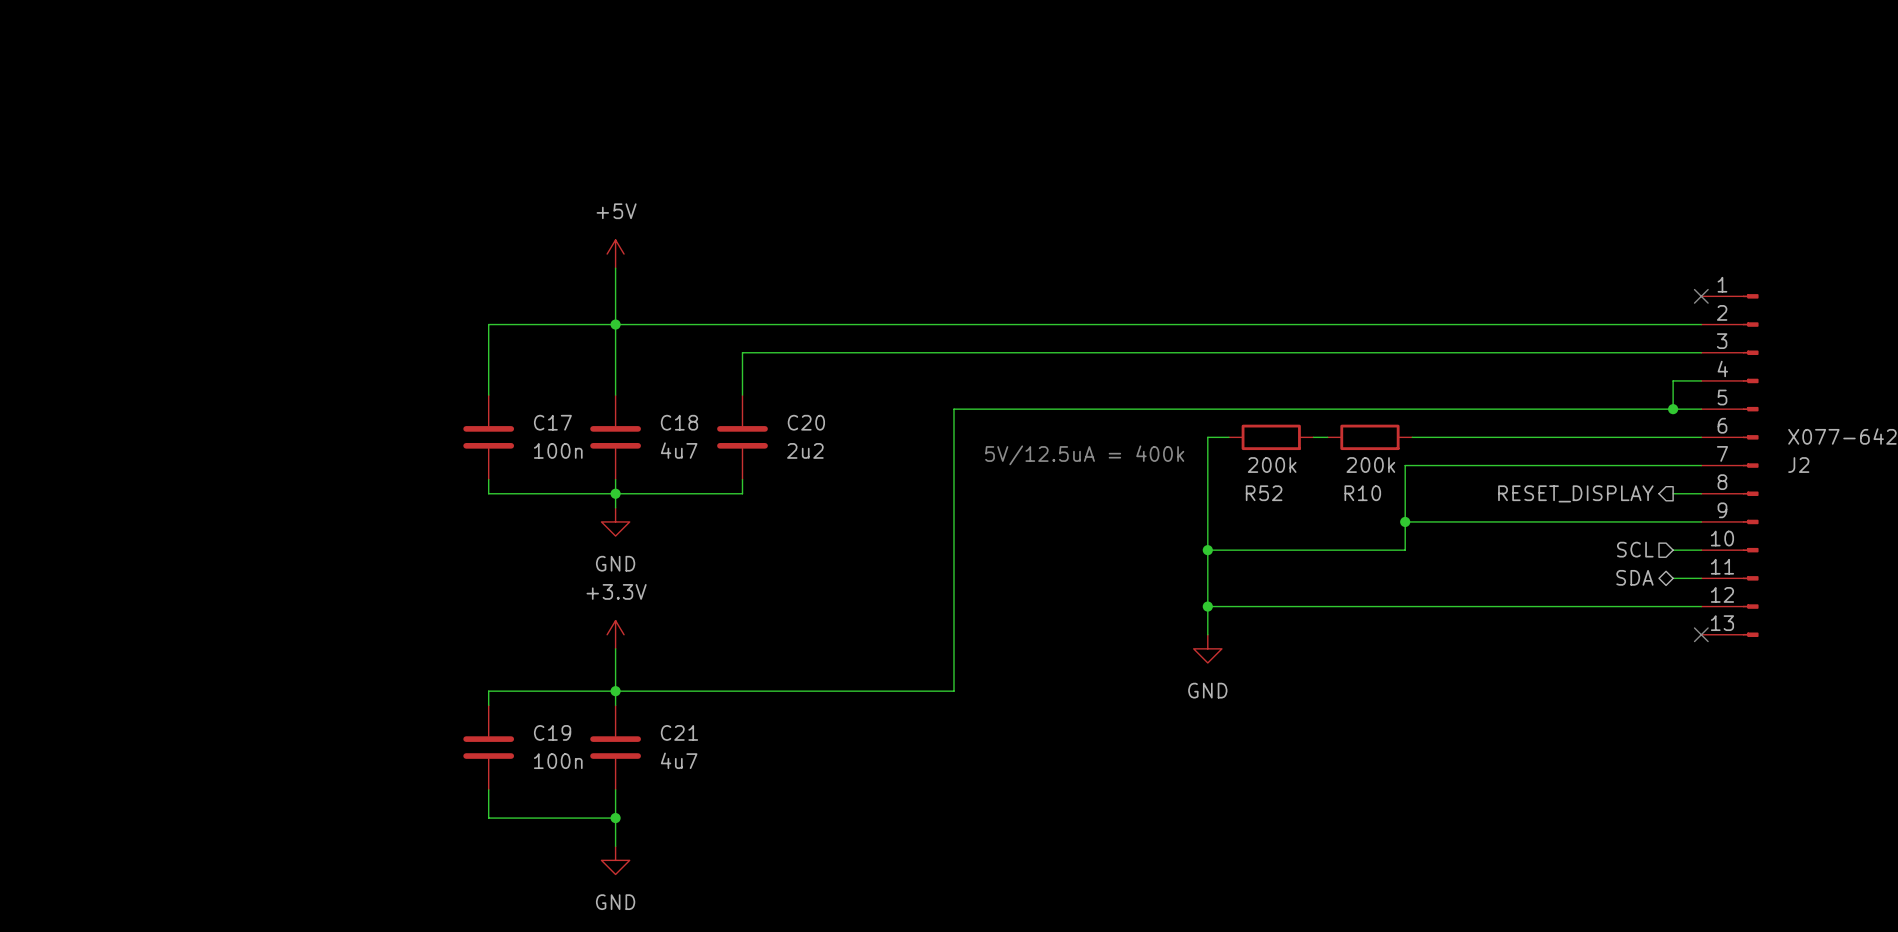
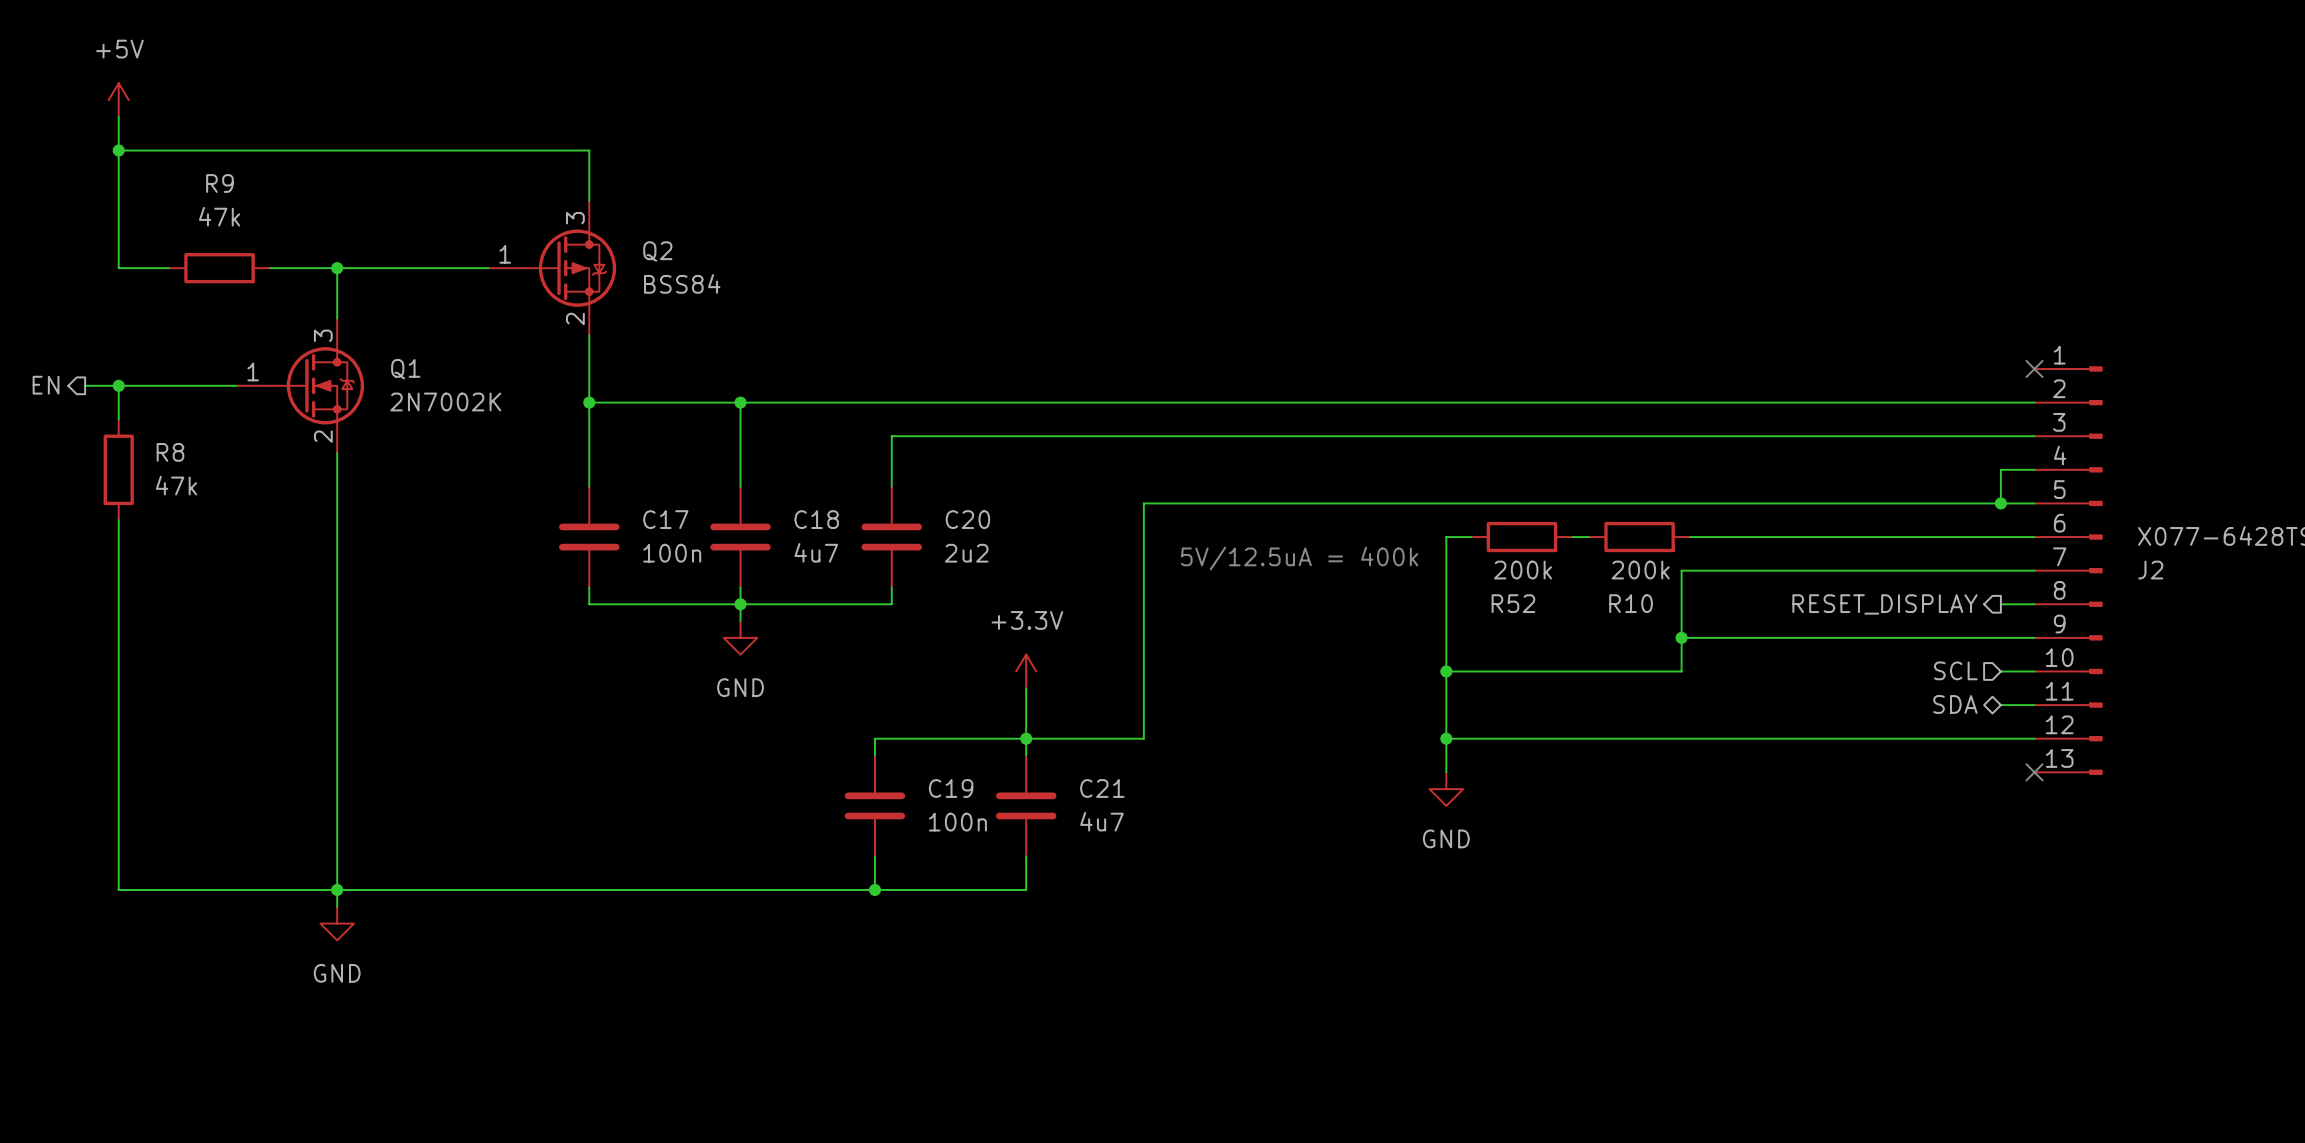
power symbol: none -> +5V (118, 100)
wire: none -> (118, 116) (118, 268) (169, 268)
wire: none -> (118, 150) (589, 150) (589, 200)
junction: none -> (118, 150)
R9: none -> 47k (219, 268)
wire: none -> (269, 268) (488, 268)
wire: none -> (337, 268) (337, 318)
junction: none -> (337, 268)
Q2: none -> BSS84 (552, 268)
power symbol: +5V (615, 254) -> none
wire: (615, 268) (615, 324) -> (589, 335) (589, 402)
hierarchical label: none -> EN (46, 385)
wire: none -> (85, 385) (236, 385)
wire: none -> (118, 385) (118, 419)
junction: none -> (118, 385)
Q1: none -> 2N7002K (300, 385)
junction: none -> (589, 402)
wire: none -> (337, 453) (337, 906)
R8: none -> 47k (118, 469)
wire: none -> (118, 520) (118, 889) (1026, 889) (1026, 856)
junction: none -> (1026, 738)
wire: (953, 606) (953, 691) (488, 691) (488, 705) -> (1143, 738) (874, 738) (874, 755)
power symbol position: +3.3V (615, 634) -> +3.3V (1026, 671)
wire: (615, 648) (615, 705) -> (1026, 688) (1026, 755)
junction: (615, 691) -> none
wire: none -> (874, 856) (874, 889)
junction: none -> (337, 889)
junction: none -> (874, 889)
C19 position: (488, 747) -> (874, 805)
C21 position: (615, 747) -> (1026, 805)
power symbol: none -> GND (337, 923)
wire: (488, 789) (488, 818) (615, 818) -> none
wire: (615, 789) (615, 846) -> none
junction: (615, 818) -> none
power symbol: GND (615, 860) -> none

